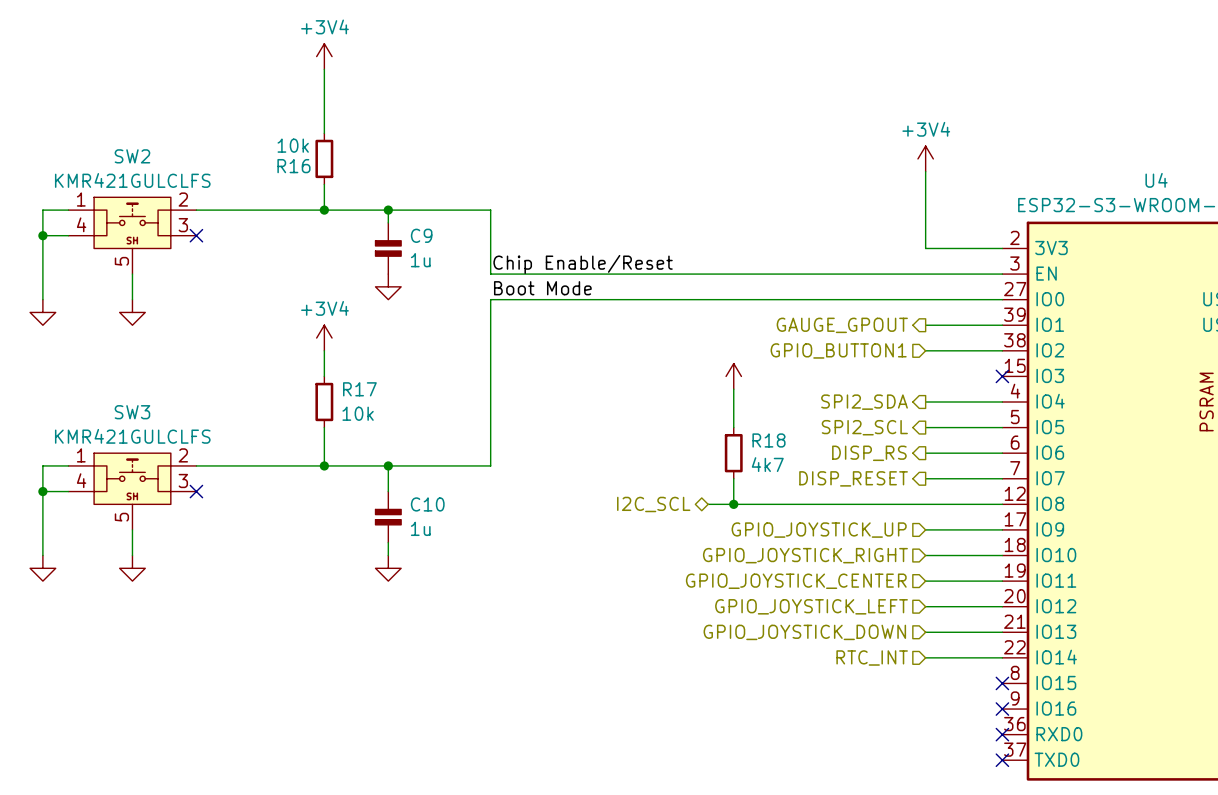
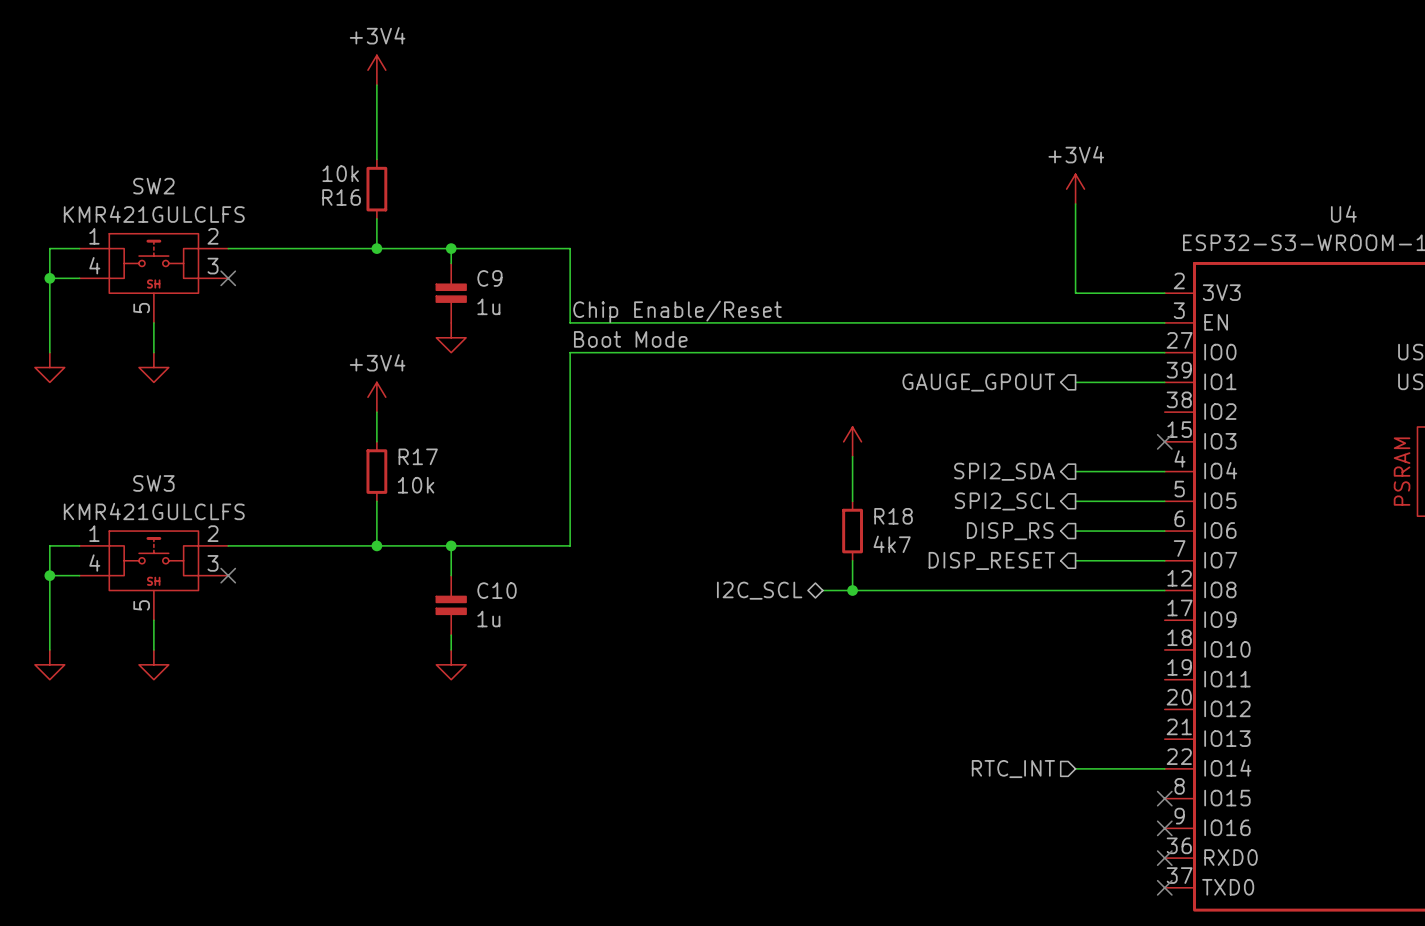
hierarchical label: GPIO_BUTTON1 (838, 350) -> none
wire: (925, 350) (1002, 350) -> none
wire: (925, 529) (1002, 529) -> none
hierarchical label: GPIO_JOYSTICK_UP (819, 530) -> none
hierarchical label: GPIO_JOYSTICK_RIGHT (805, 555) -> none
wire: (925, 555) (1002, 555) -> none
hierarchical label: GPIO_JOYSTICK_CENTER (796, 581) -> none
wire: (925, 581) (1002, 581) -> none
hierarchical label: GPIO_JOYSTICK_LEFT (811, 606) -> none
wire: (925, 606) (1002, 606) -> none
hierarchical label: GPIO_JOYSTICK_DOWN (804, 632) -> none
wire: (925, 632) (1002, 632) -> none

